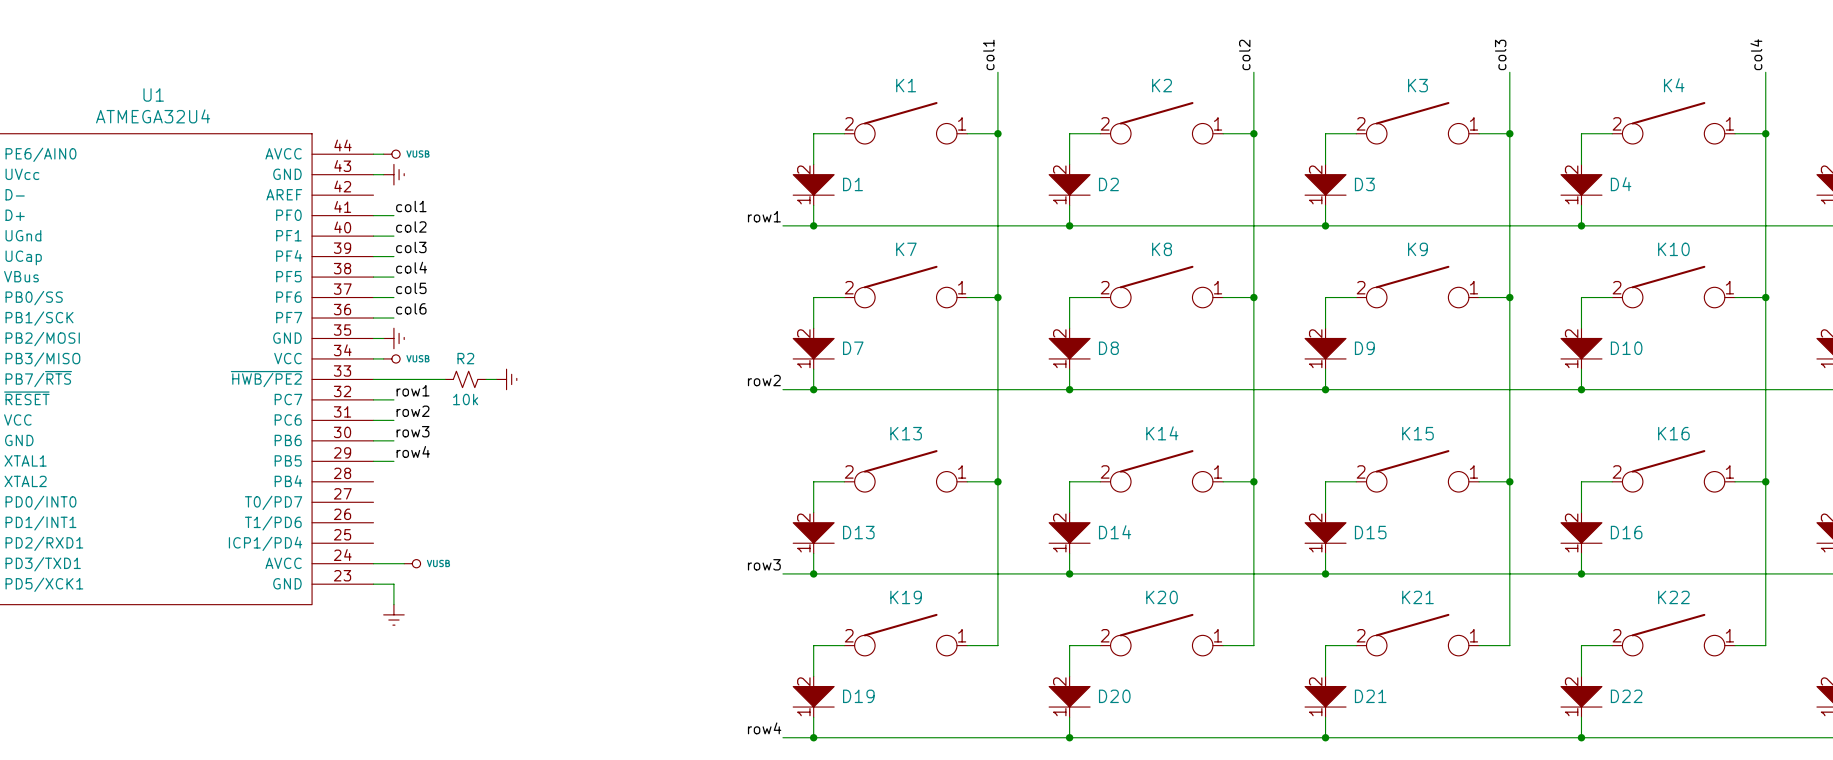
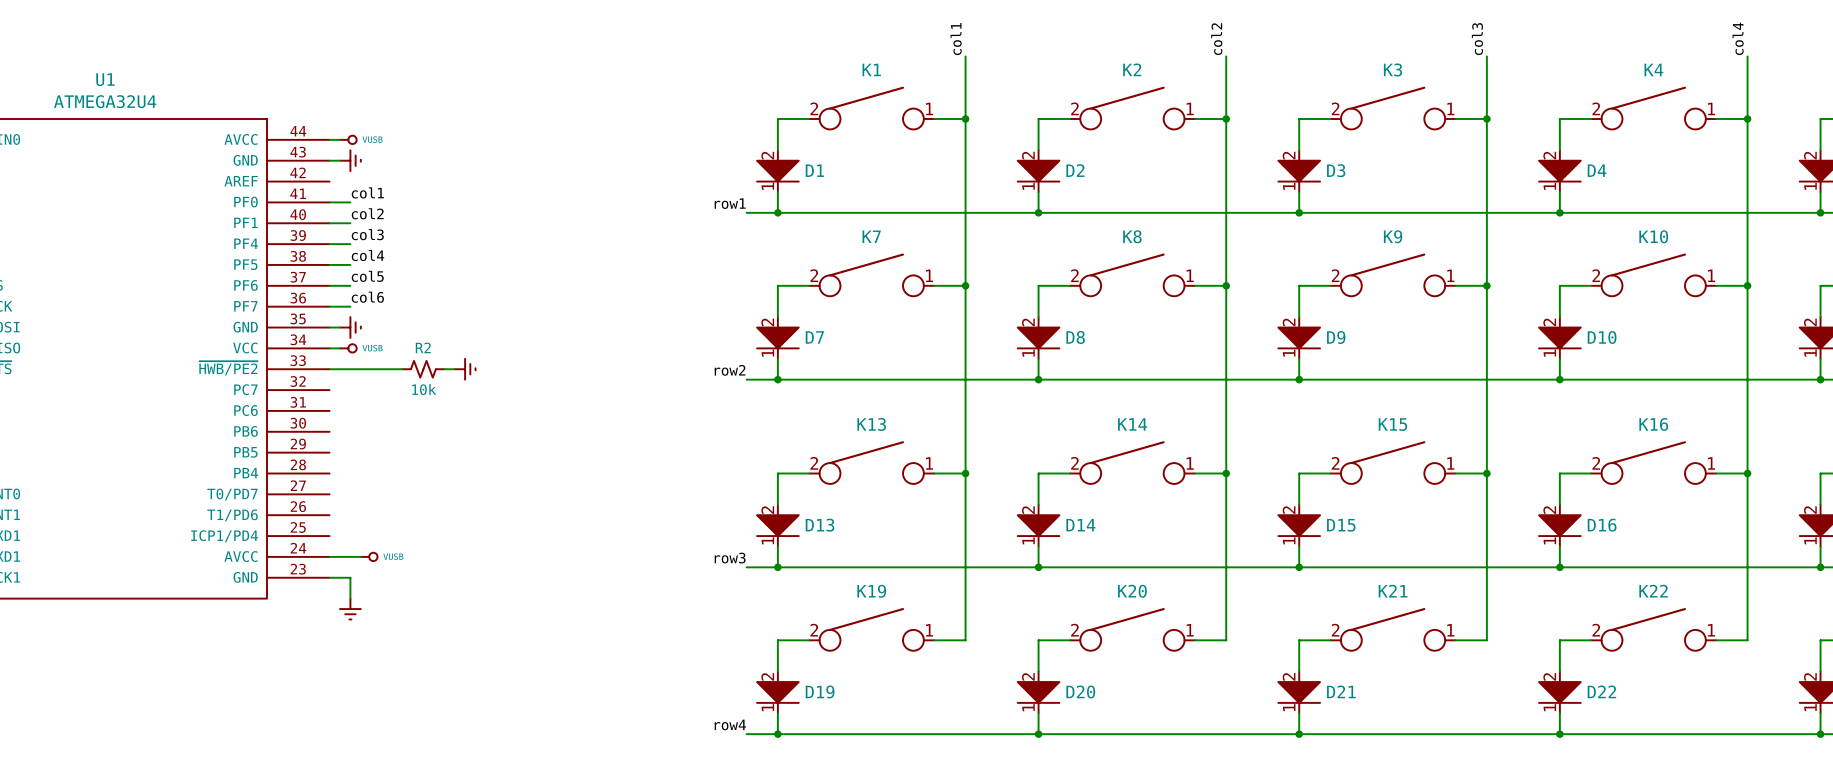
label: row1 (413, 390) -> none
wire: (373, 399) (393, 399) -> none
label: row2 (413, 411) -> none
wire: (373, 420) (393, 420) -> none
label: row3 (413, 431) -> none
wire: (373, 440) (393, 440) -> none
label: row4 (413, 451) -> none
wire: (373, 461) (393, 461) -> none

